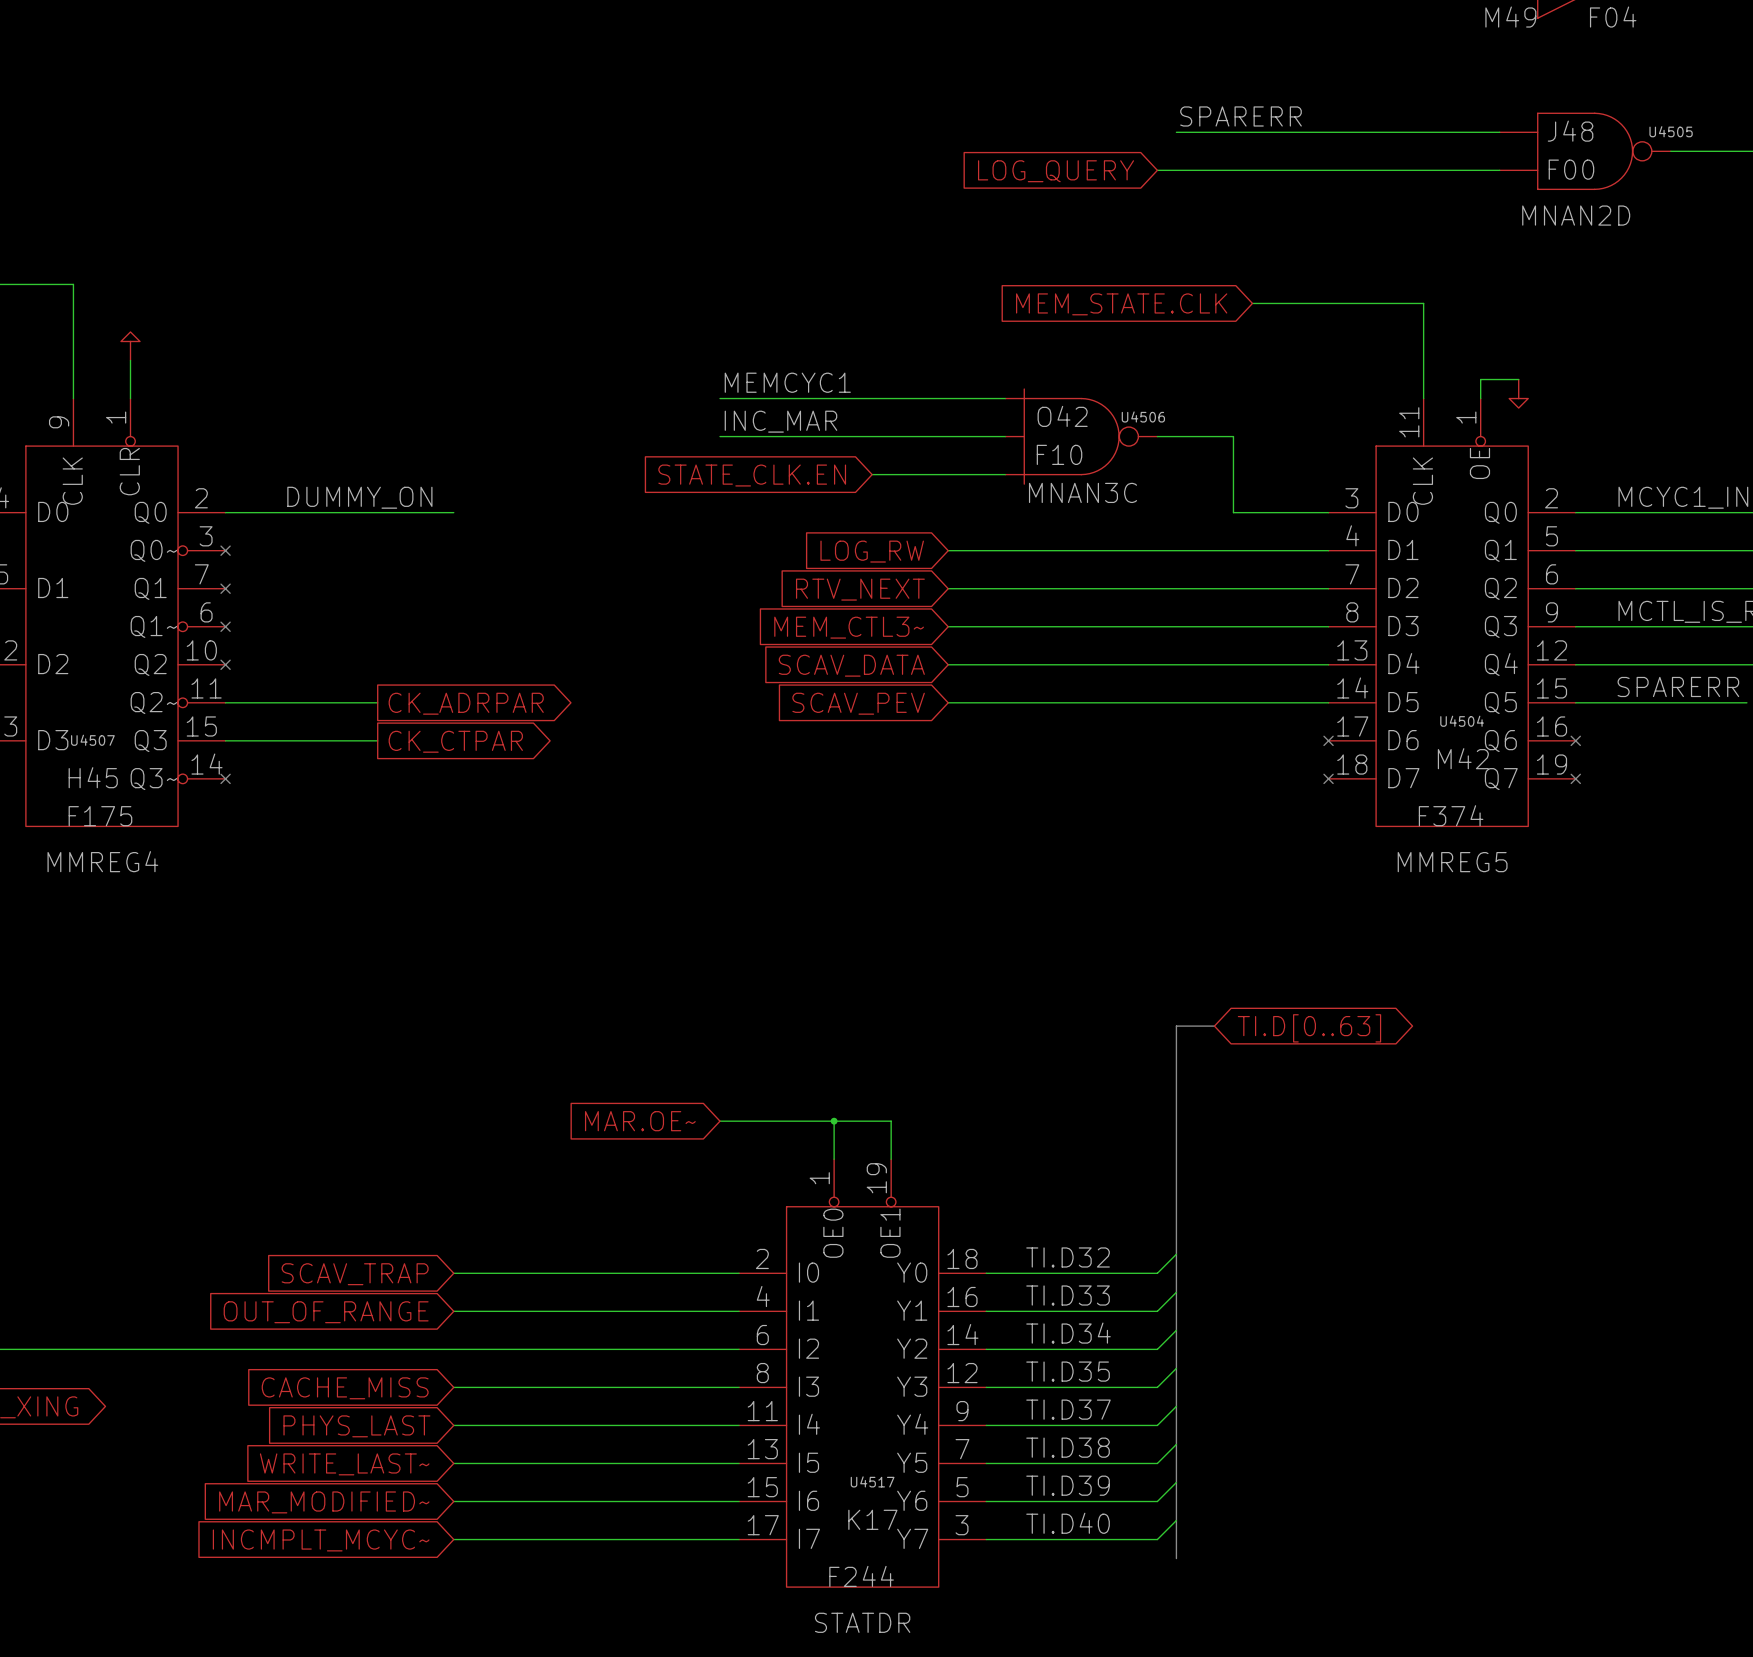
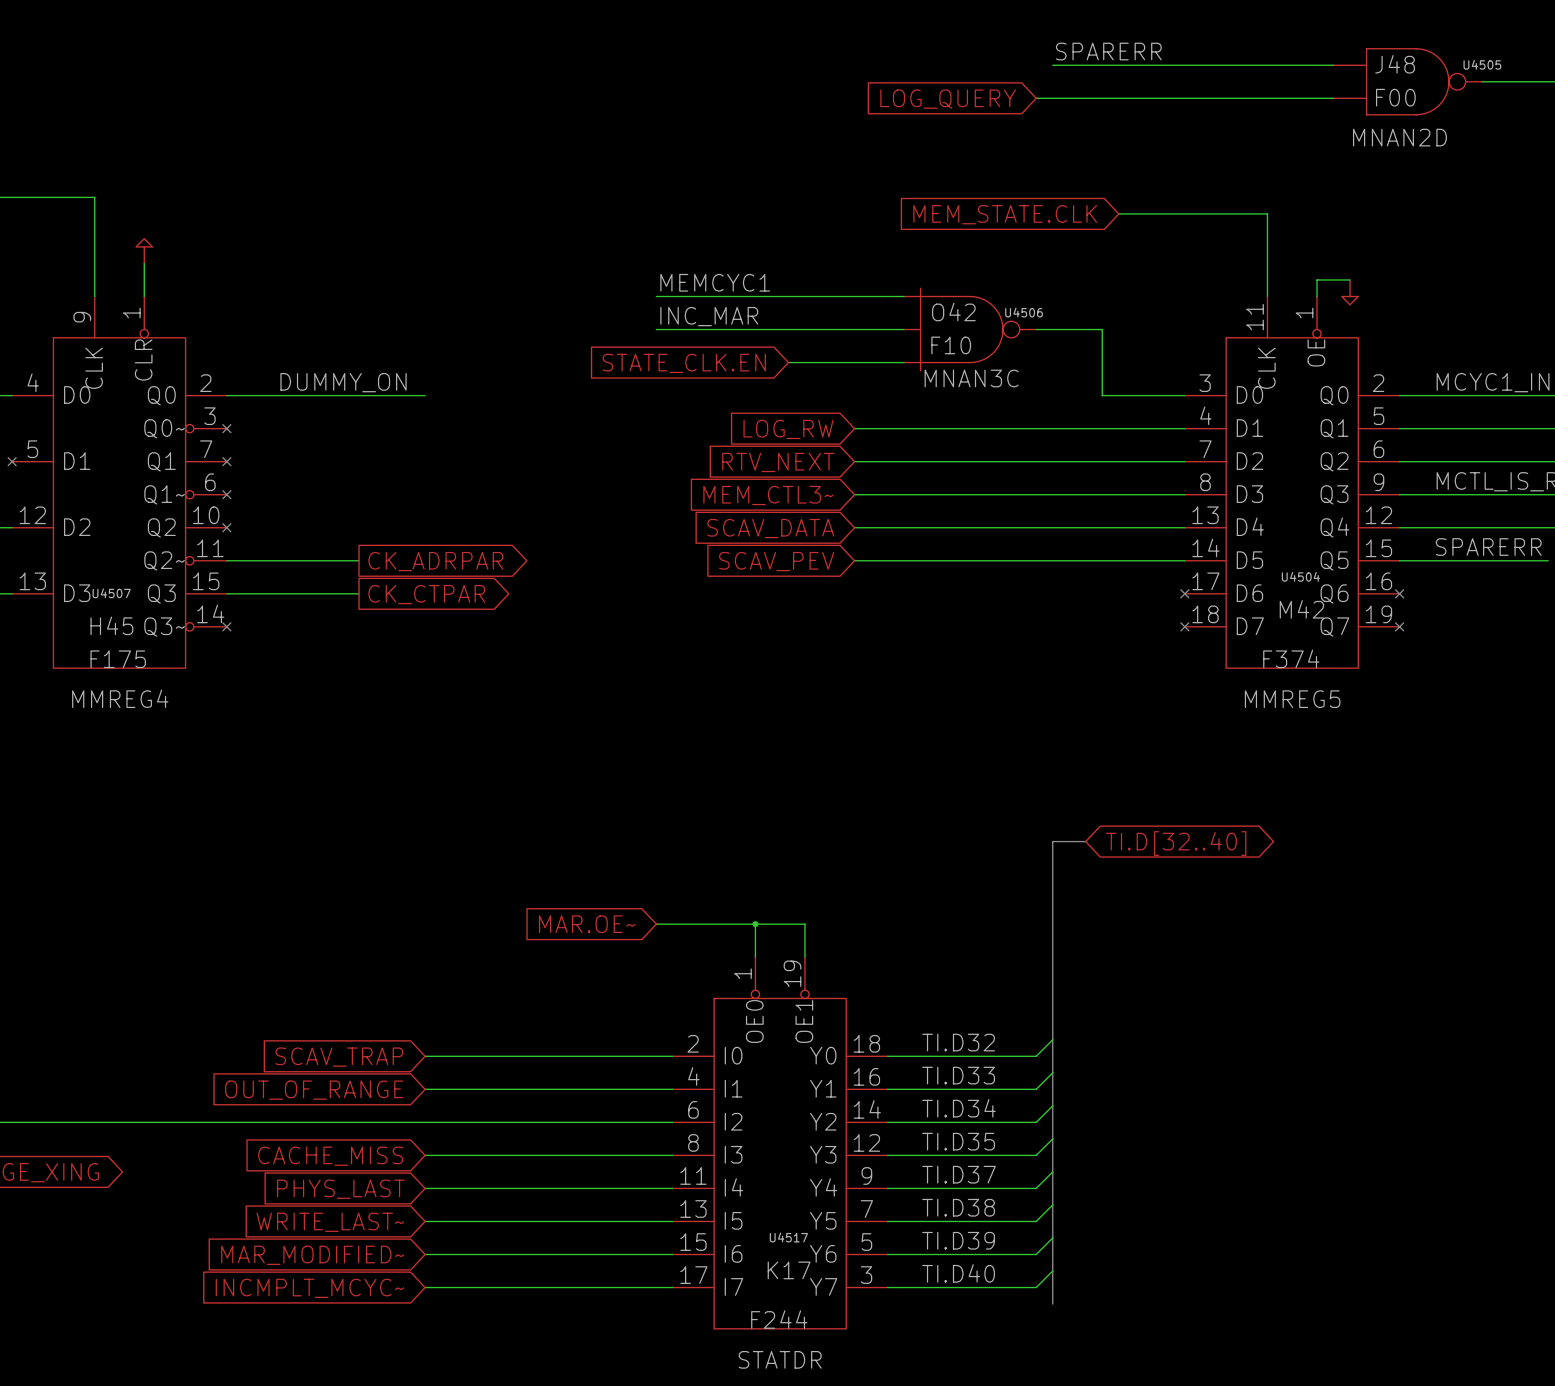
global label: TI.D[0..63] (1309, 1028) -> TI.D[32..40] (1176, 843)

